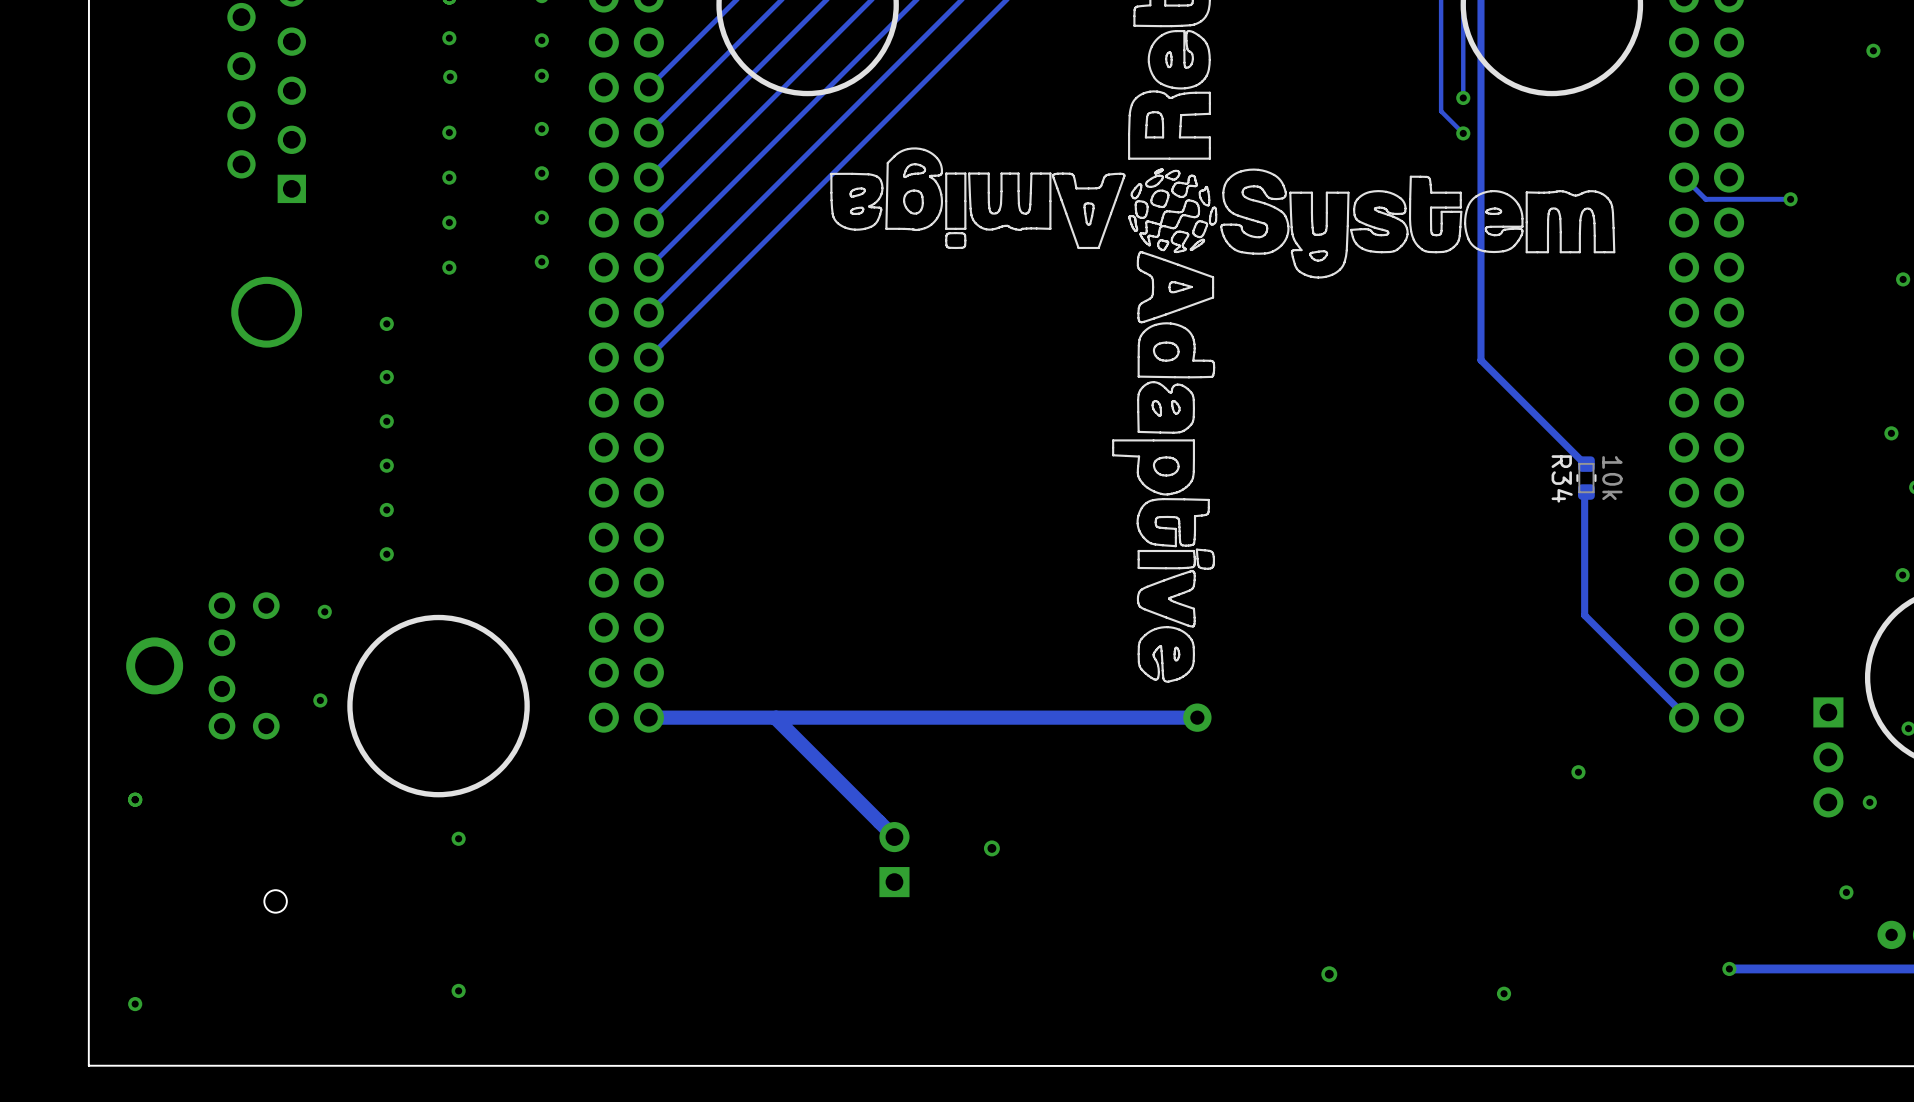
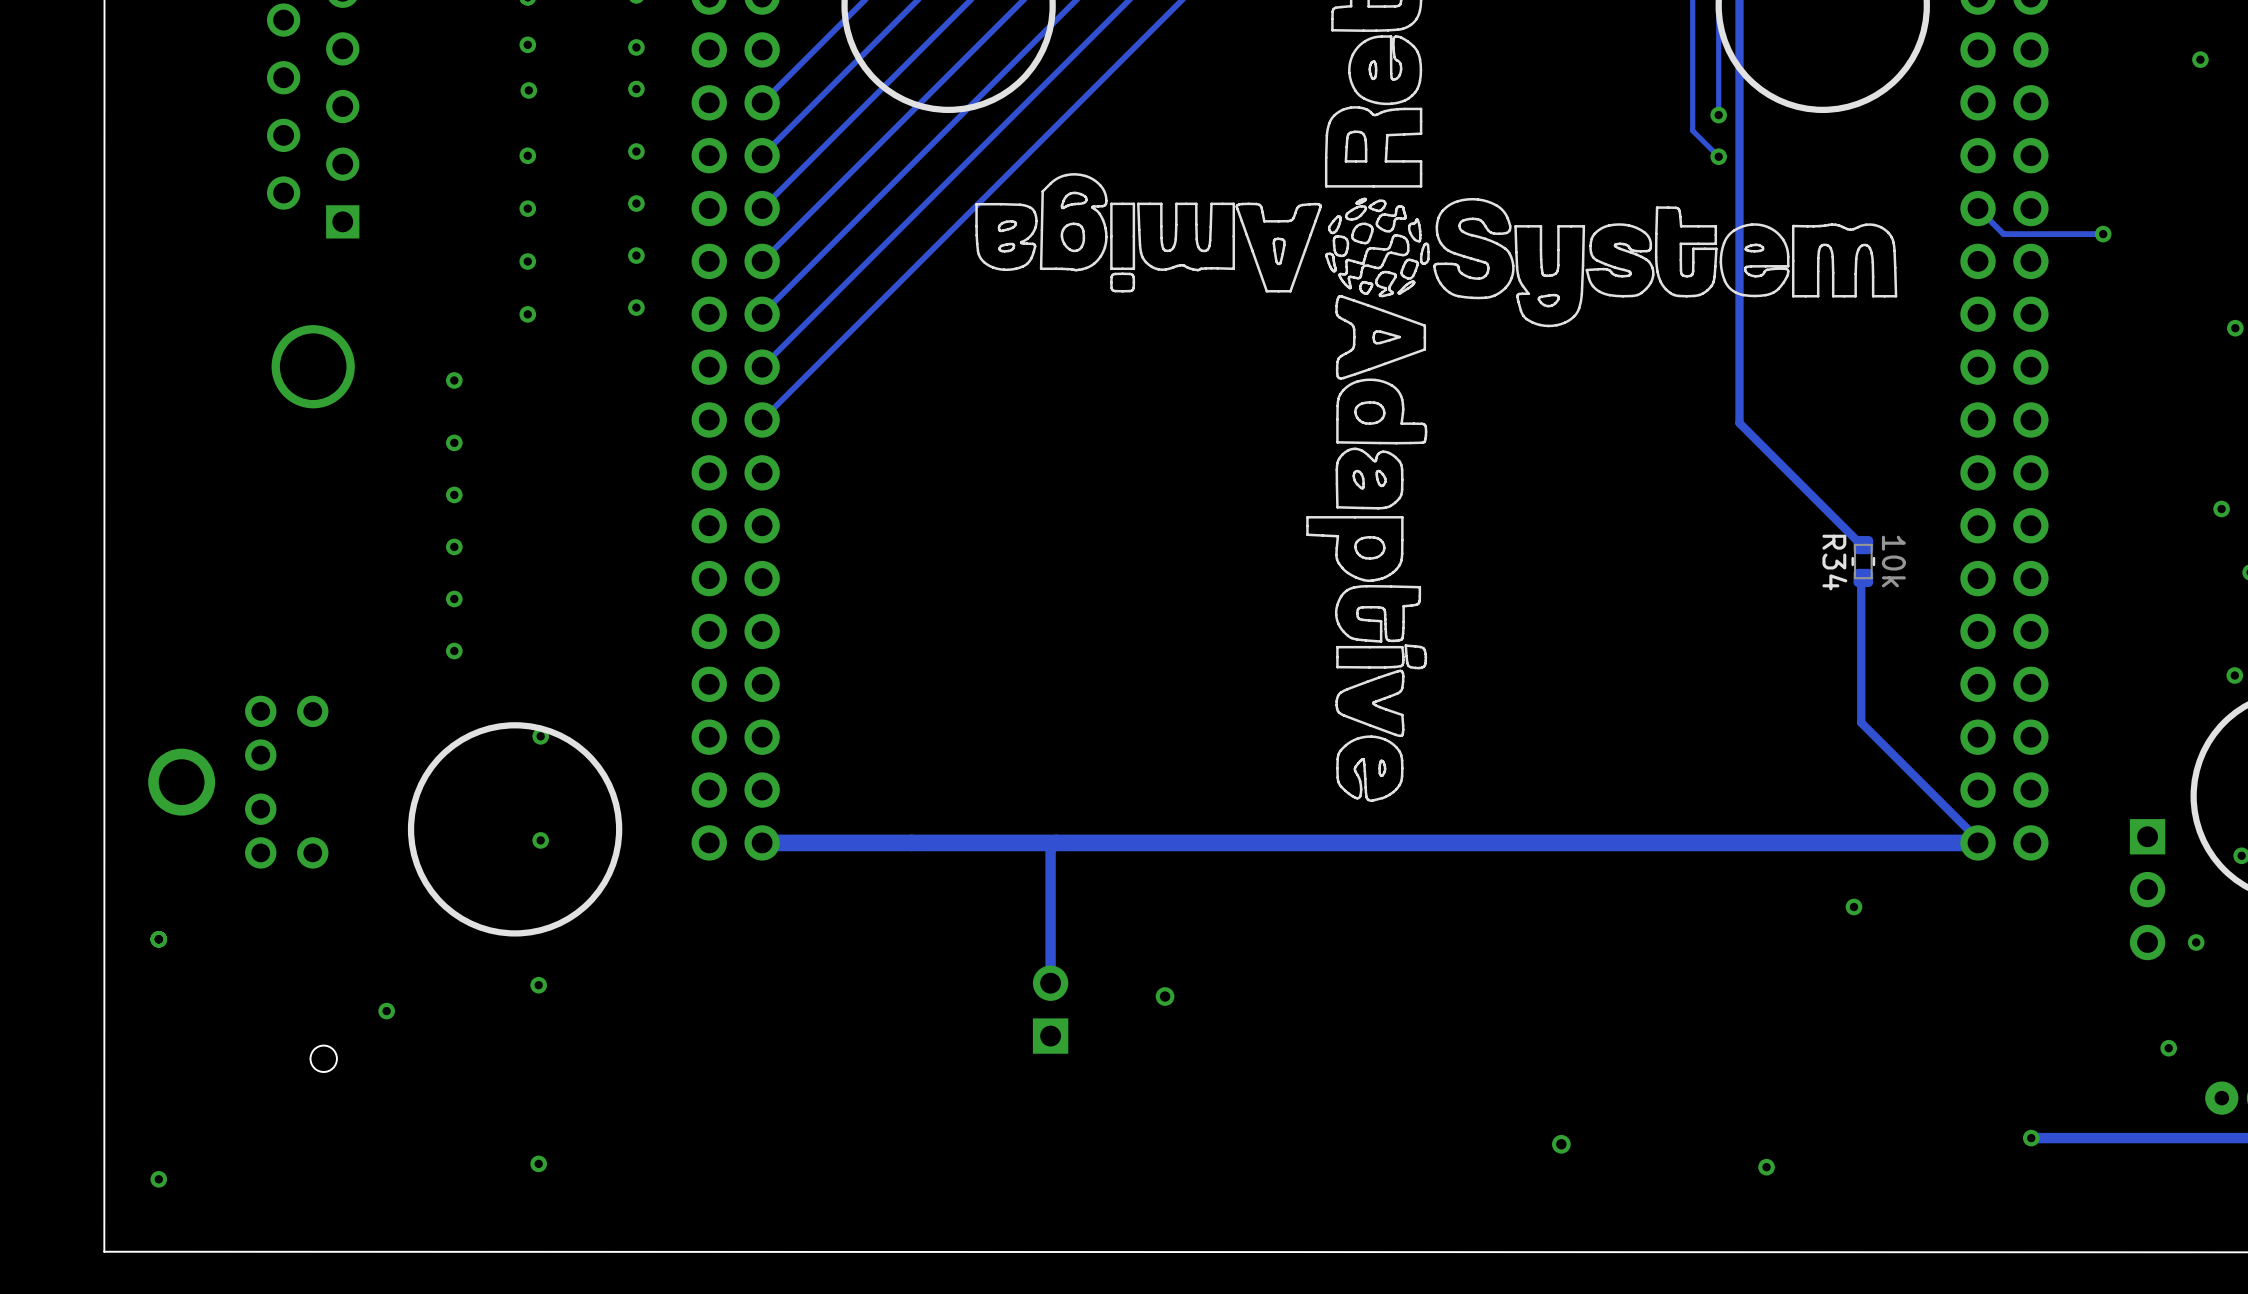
via: (324, 611) -> none
via: none -> (540, 736)
via: (320, 700) -> none
via: none -> (540, 840)
via: (1197, 717) -> none
track: none -> (1978, 842) (1406, 842)
track: (776, 718) (894, 837) -> (1056, 842) (1050, 848) (1050, 983)
via: none -> (386, 1011)

